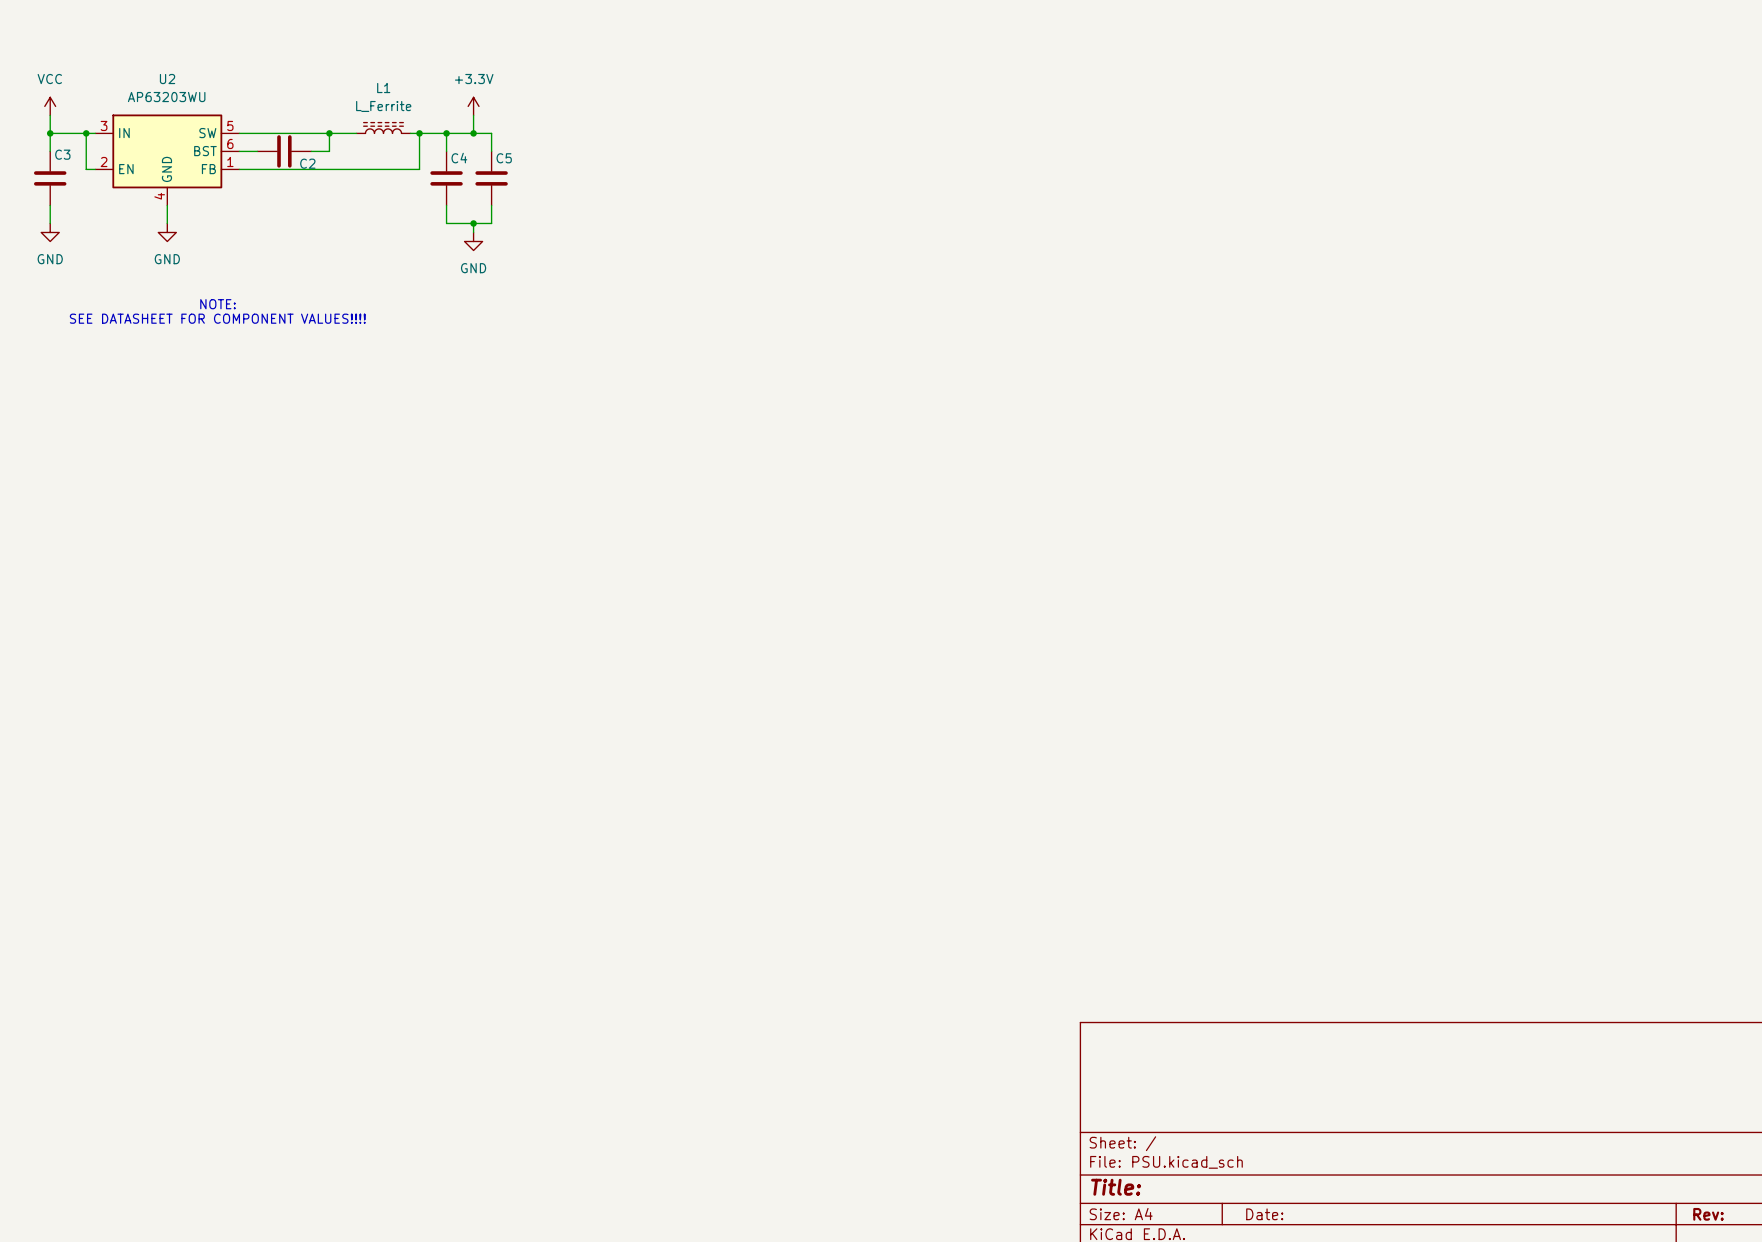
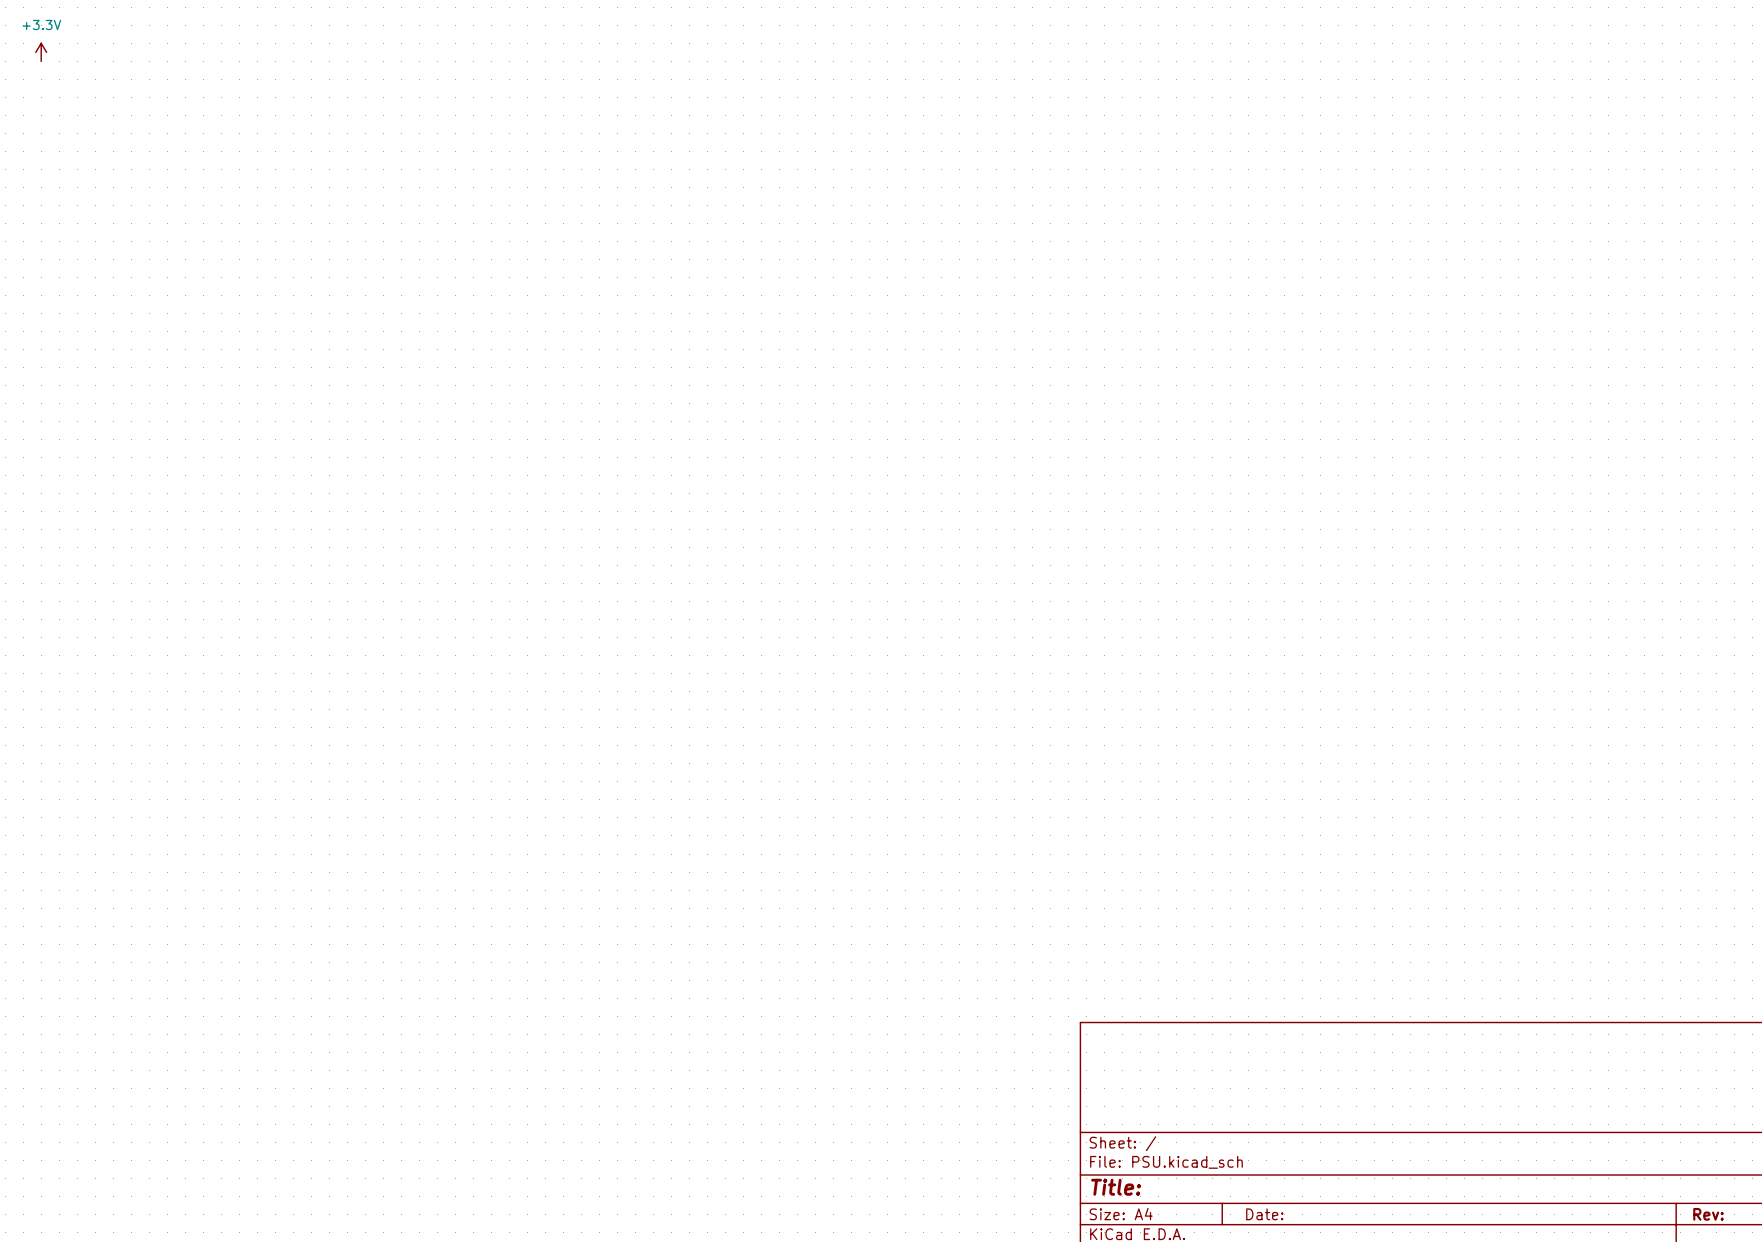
power symbol: none -> +3.3V (41, 52)
power symbol: VCC (50, 106) -> none
power symbol: +3.3V (473, 106) -> none
wire: (50, 115) (50, 151) -> none
wire: (473, 115) (473, 133) -> none
L1: L_Ferrite (383, 128) -> none
wire: (50, 133) (95, 133) -> none
junction: (50, 133) -> none
wire: (86, 133) (86, 169) (95, 169) -> none
junction: (86, 133) -> none
wire: (239, 133) (356, 133) -> none
wire: (329, 133) (329, 151) (311, 151) -> none
junction: (329, 133) -> none
wire: (410, 133) (491, 133) (491, 151) -> none
wire: (419, 133) (419, 169) (239, 169) -> none
junction: (419, 133) -> none
wire: (446, 133) (446, 151) -> none
junction: (446, 133) -> none
junction: (473, 133) -> none
wire: (239, 151) (257, 151) -> none
C2: (284, 151) -> none
U2: AP63203WU (167, 159) -> none
C3: (50, 178) -> none
C4: (446, 178) -> none
C5: (491, 178) -> none
wire: (50, 205) (50, 223) -> none
wire: (167, 205) (167, 223) -> none
wire: (446, 205) (446, 223) (491, 223) (491, 205) -> none
wire: (473, 223) (473, 232) -> none
junction: (473, 223) -> none
power symbol: GND (50, 232) -> none
power symbol: GND (167, 232) -> none
power symbol: GND (473, 241) -> none
text: NOTE: (217, 304) -> none
text: SEE DATASHEET FOR COMPONENT VALUES!!!! (217, 318) -> none

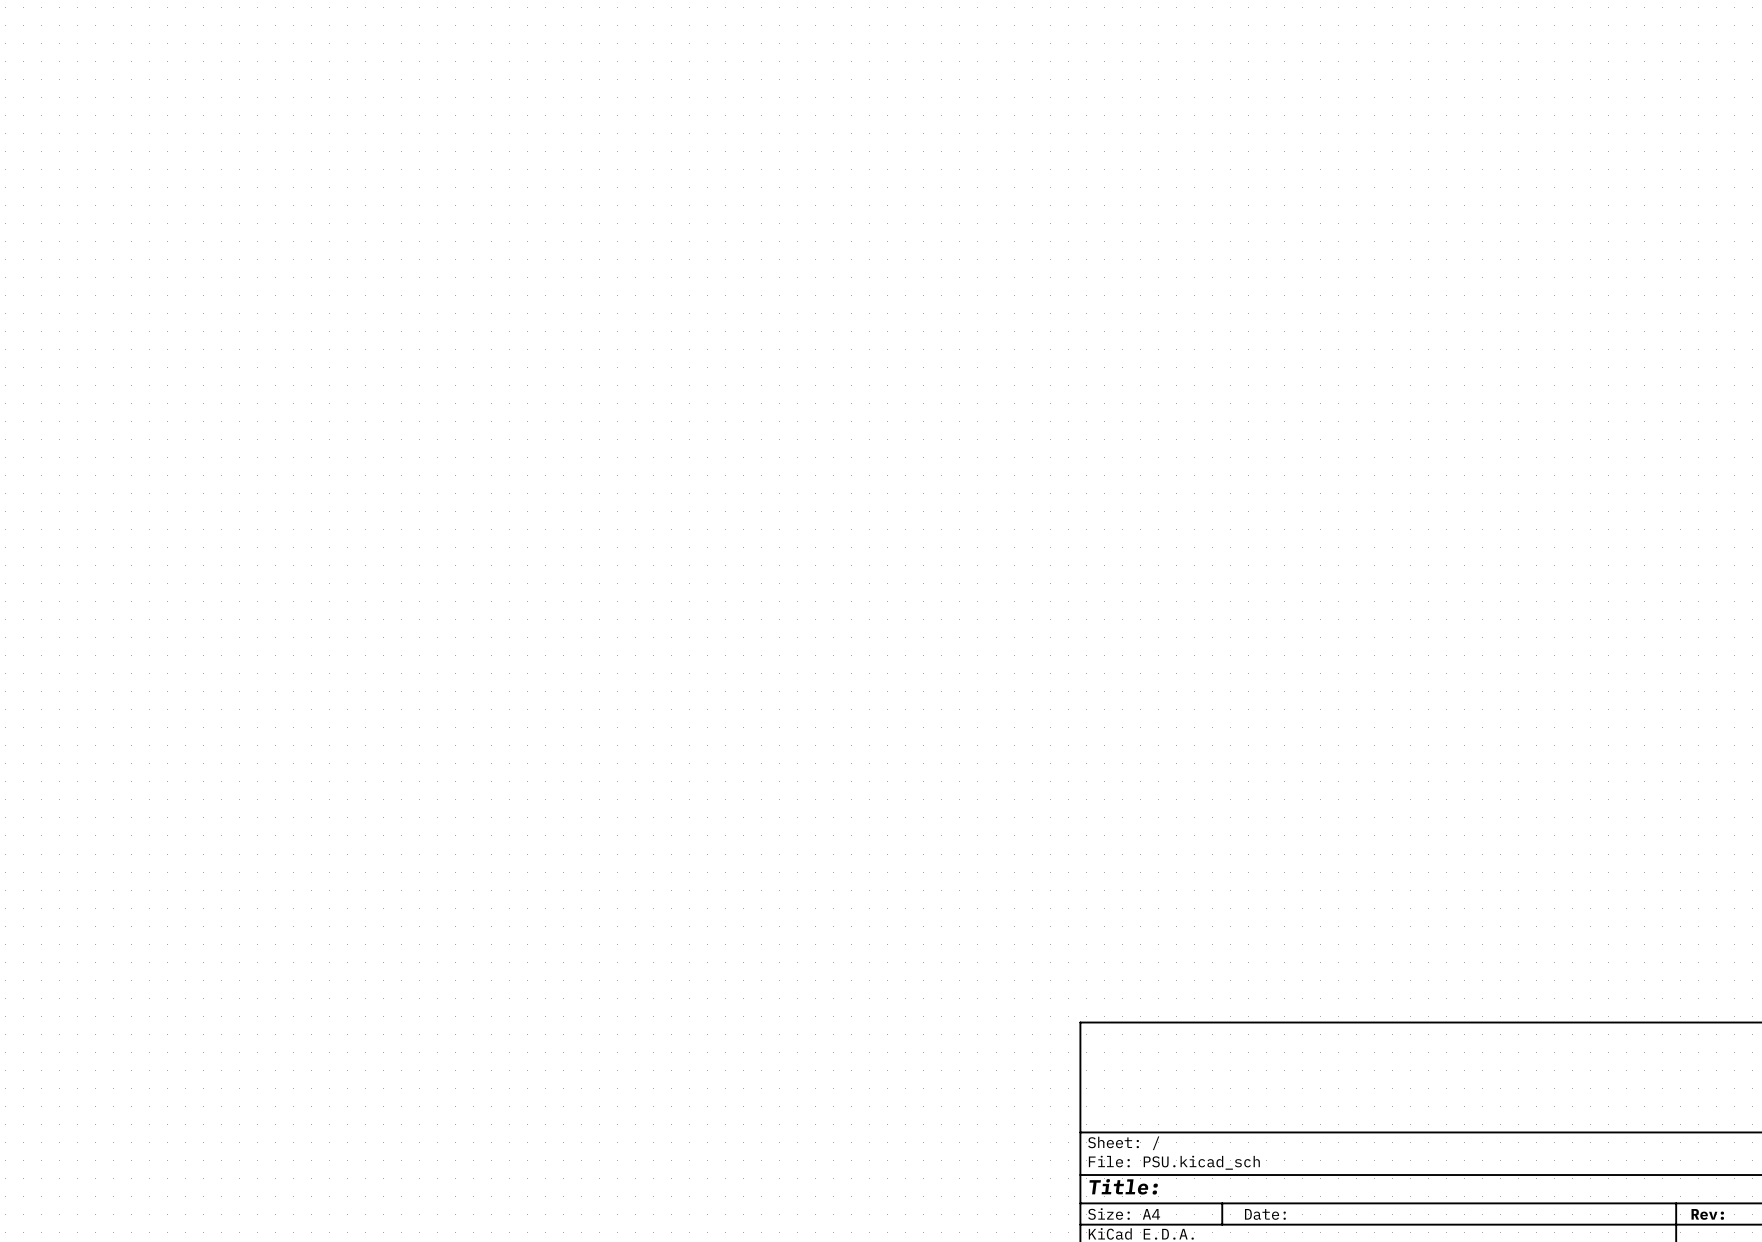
power symbol: +3.3V (41, 52) -> none

